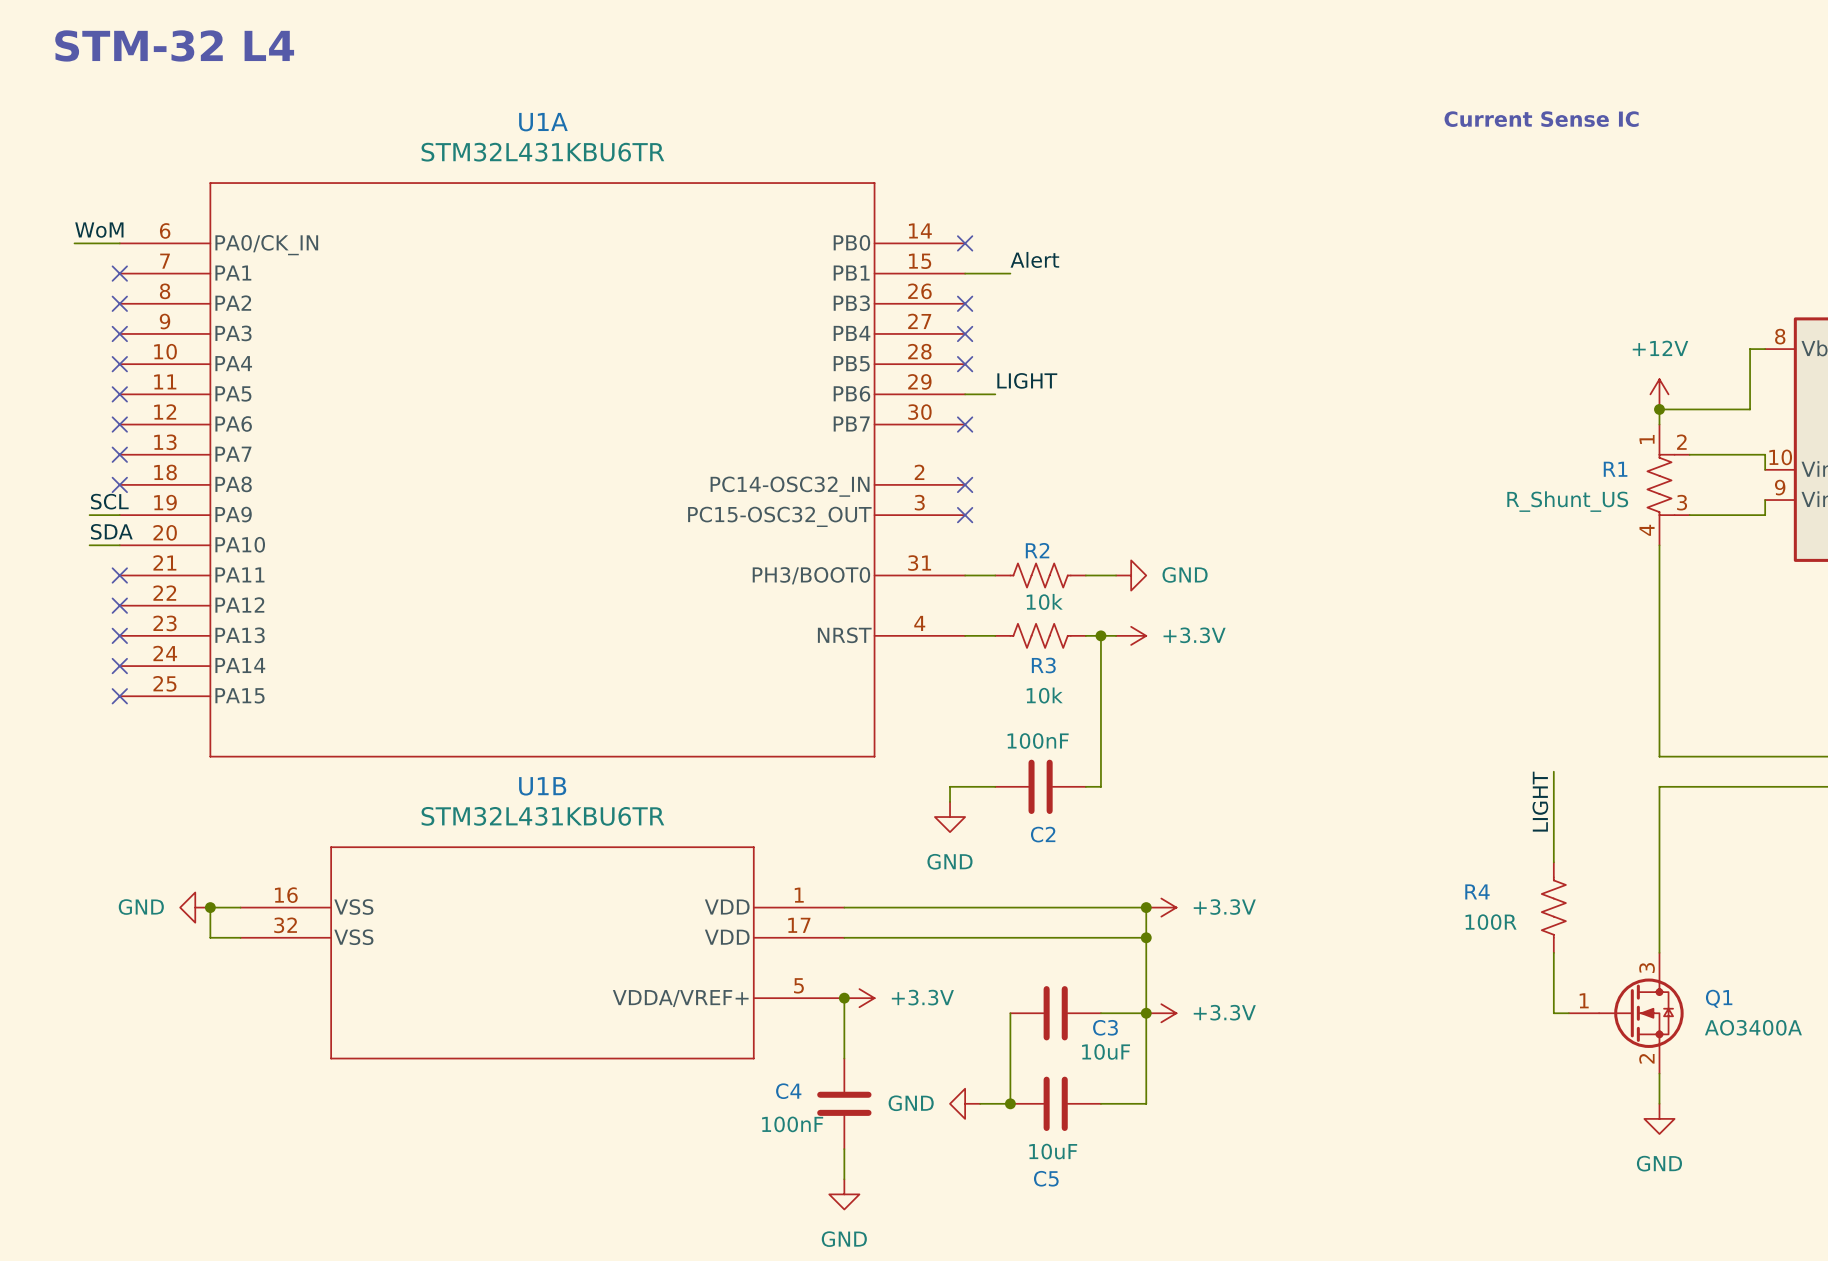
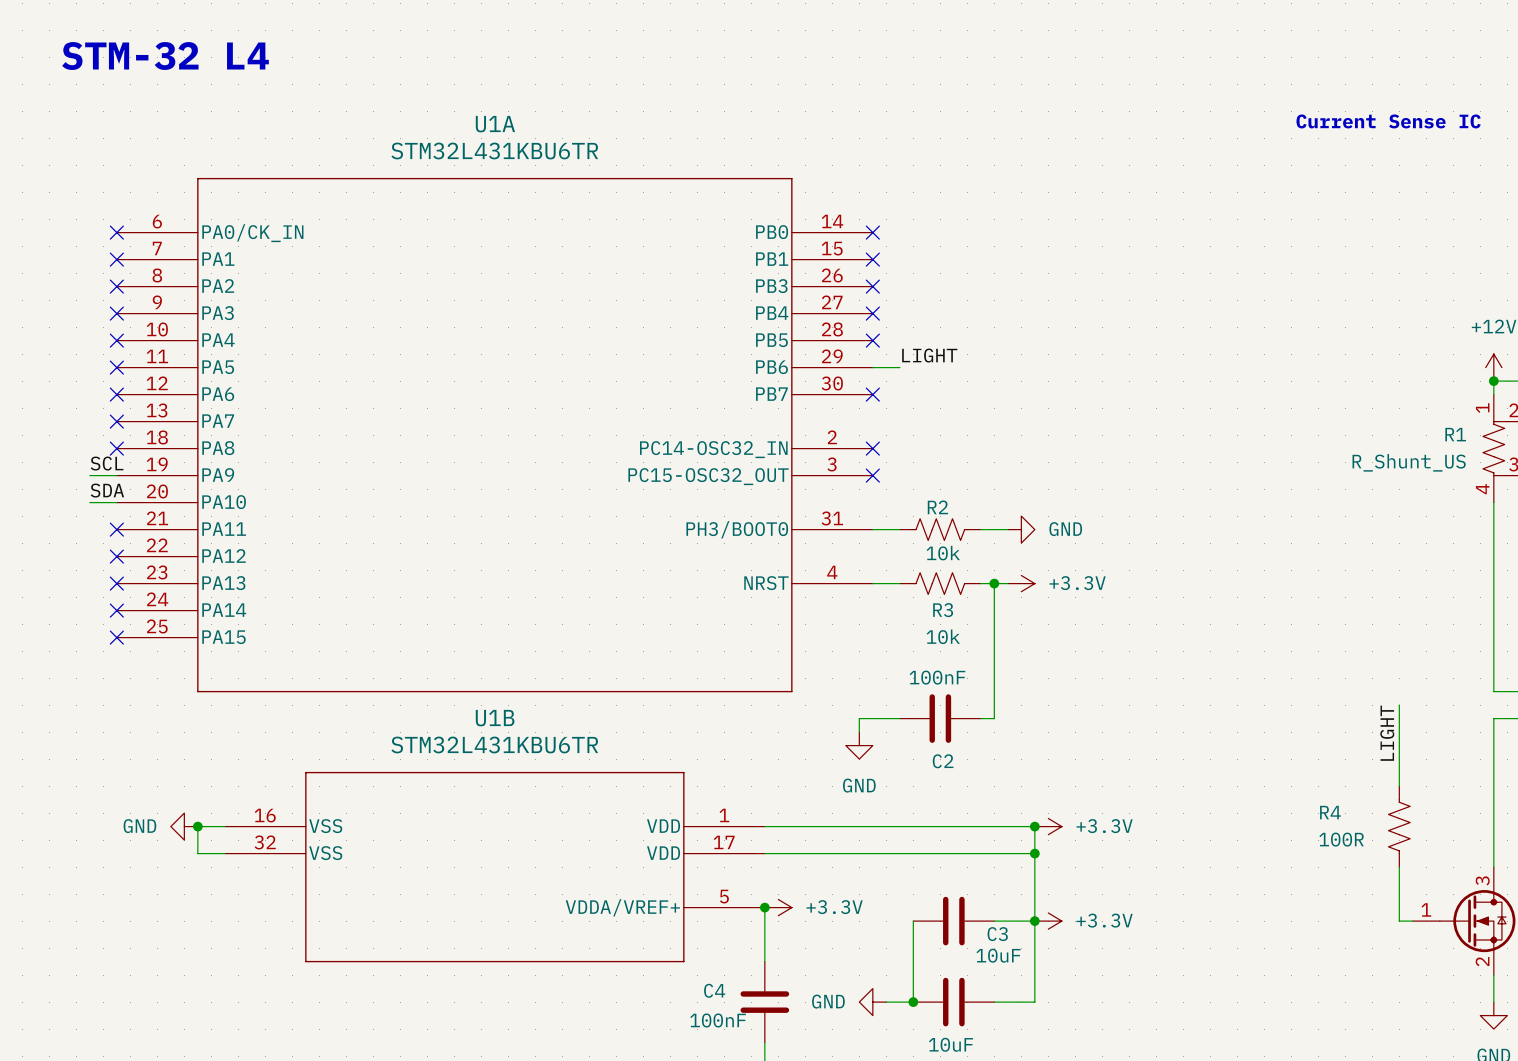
label: WoM (99, 230) -> none
wire: (74, 243) (119, 243) -> none
no-connect mark: none -> (116, 232)
label: Alert (1034, 259) -> none
wire: (965, 273) (1010, 273) -> none
no-connect mark: none -> (872, 259)

